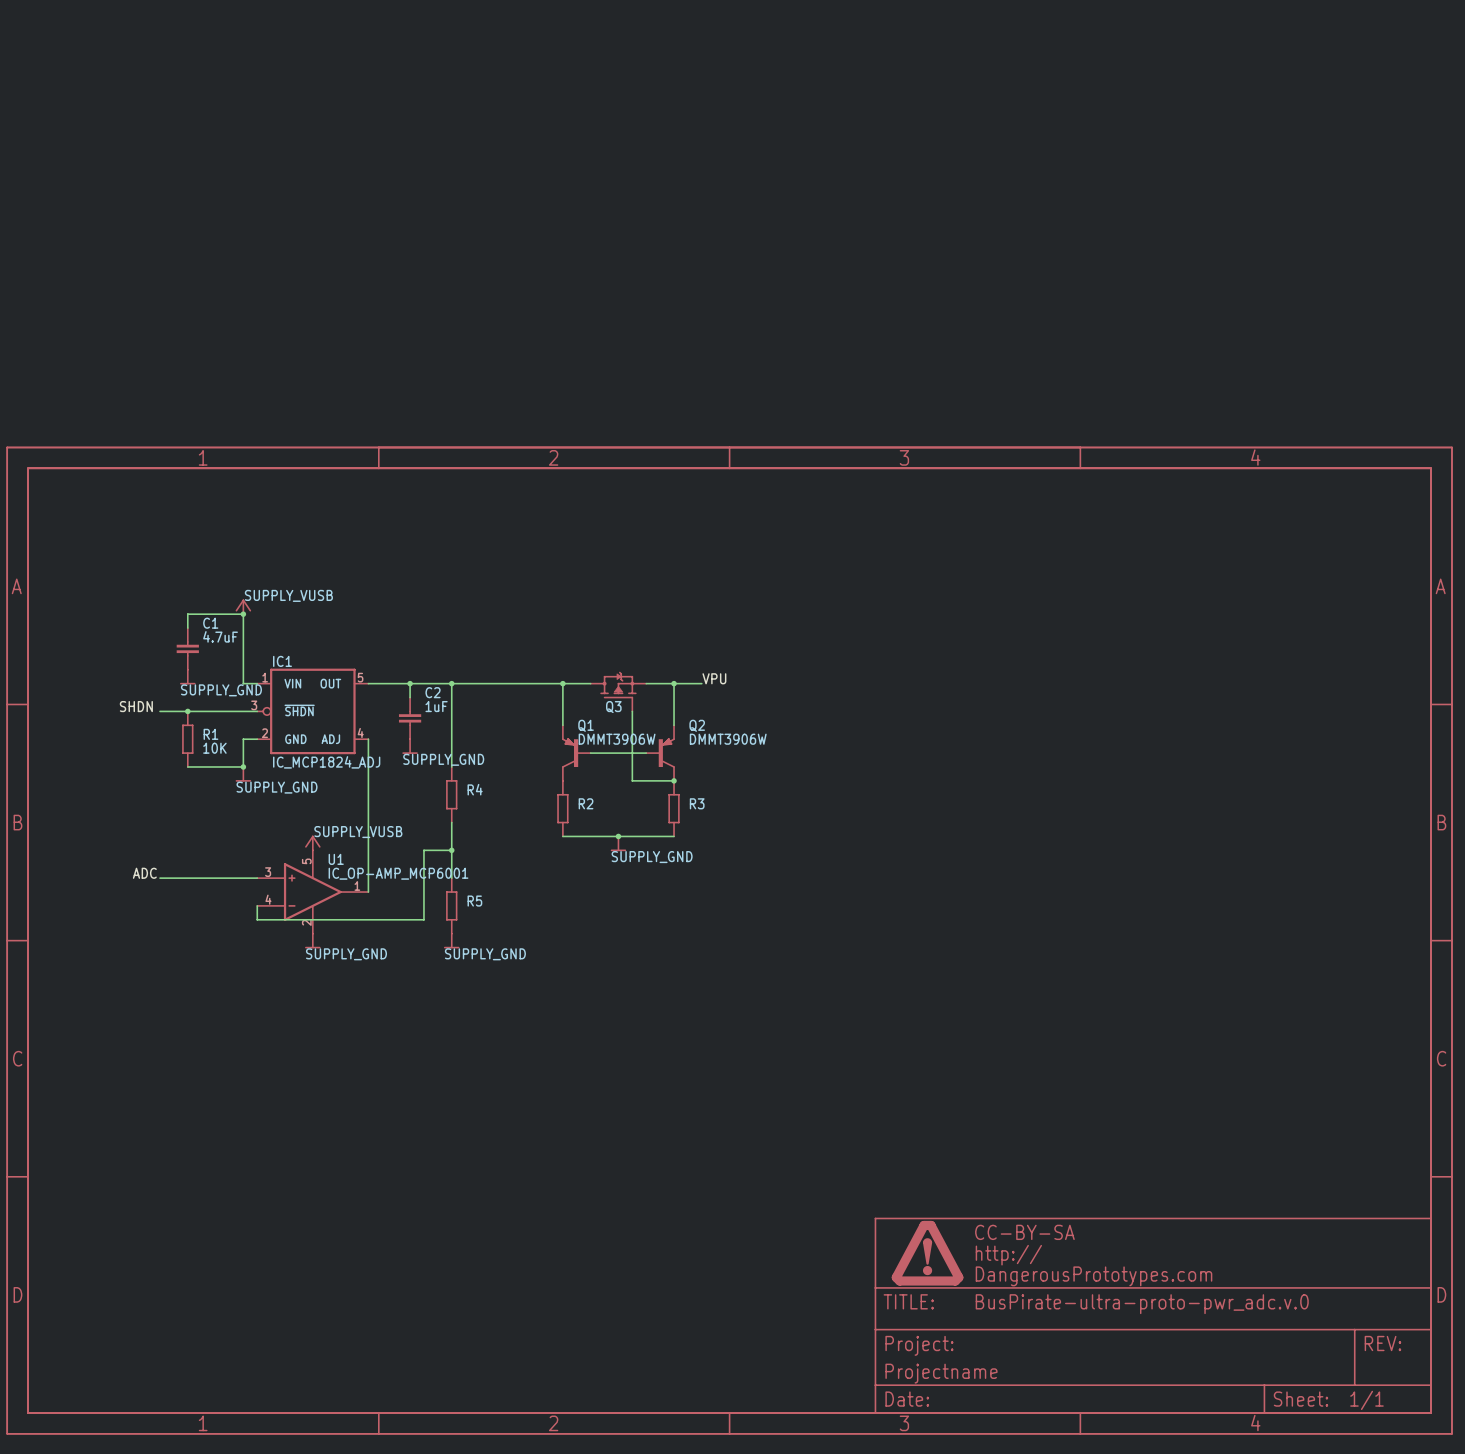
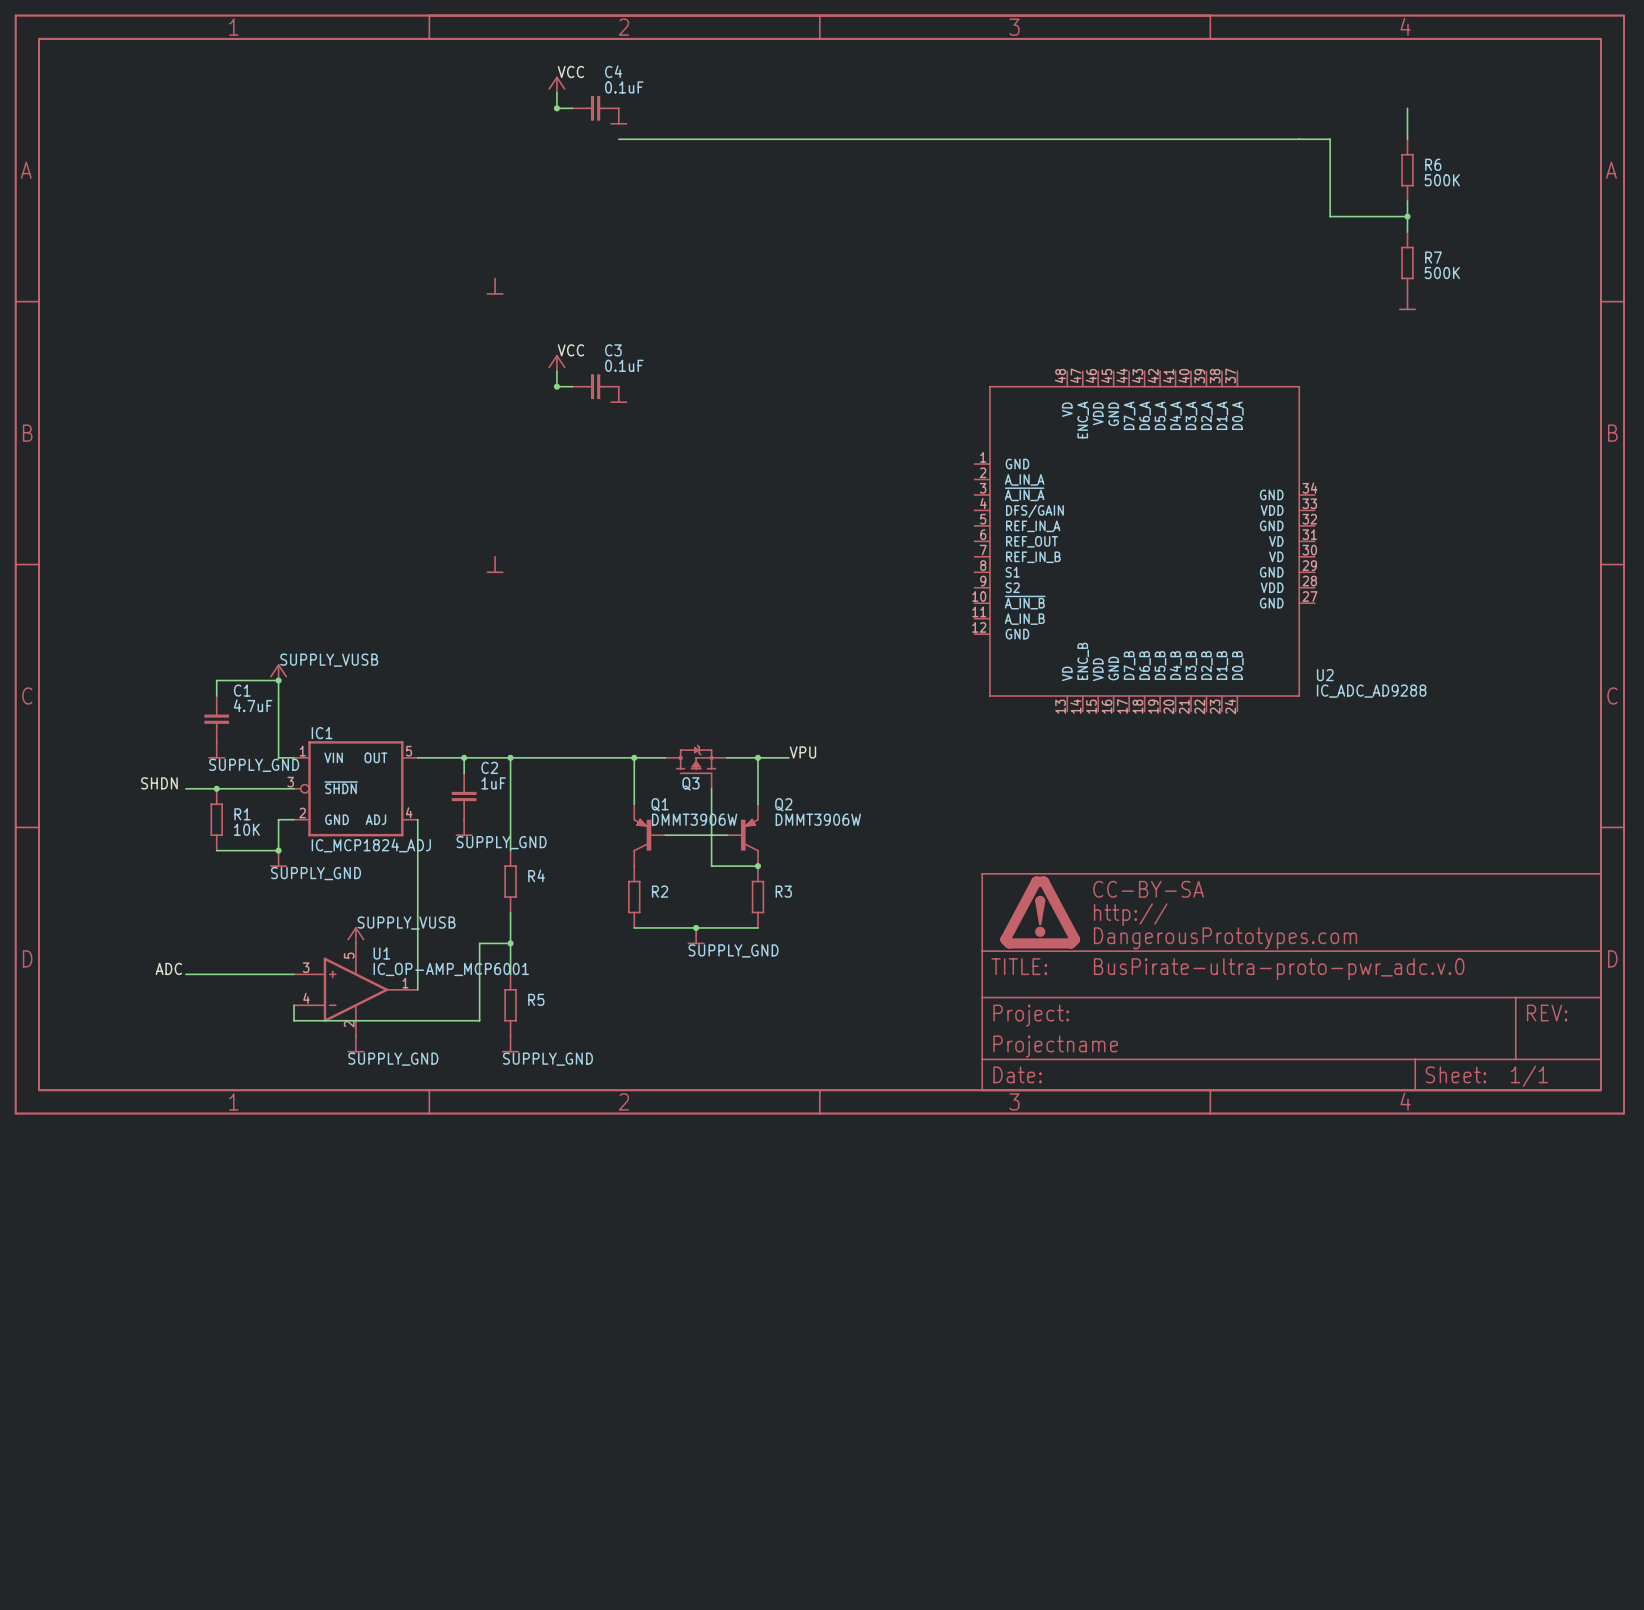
label: none -> VCC (570, 71)
power symbol: none -> (556, 84)
wire: none -> (556, 92) (556, 108) (572, 108)
junction: none -> (556, 108)
C4: none -> 0.1uF (595, 108)
wire: none -> (1407, 108) (1407, 139)
power symbol: none -> (618, 116)
wire: none -> (618, 139) (1330, 139) (1330, 216) (1407, 216)
R6: none -> 500K (1407, 170)
wire: none -> (1407, 201) (1407, 232)
junction: none -> (1407, 216)
R7: none -> 500K (1407, 262)
power symbol: none -> (495, 286)
power symbol: none -> (1407, 302)
label: none -> VCC (570, 350)
power symbol: none -> (556, 363)
wire: none -> (556, 371) (556, 386) (572, 386)
junction: none -> (556, 386)
C3: none -> 0.1uF (595, 386)
power symbol: none -> (618, 394)
U2: none -> IC_ADC_AD9288 (1144, 541)
part: none -> (819, 564)
power symbol: none -> (495, 564)
part: none -> (1291, 982)
part: (729, 940) -> none
part: (1153, 1315) -> none

